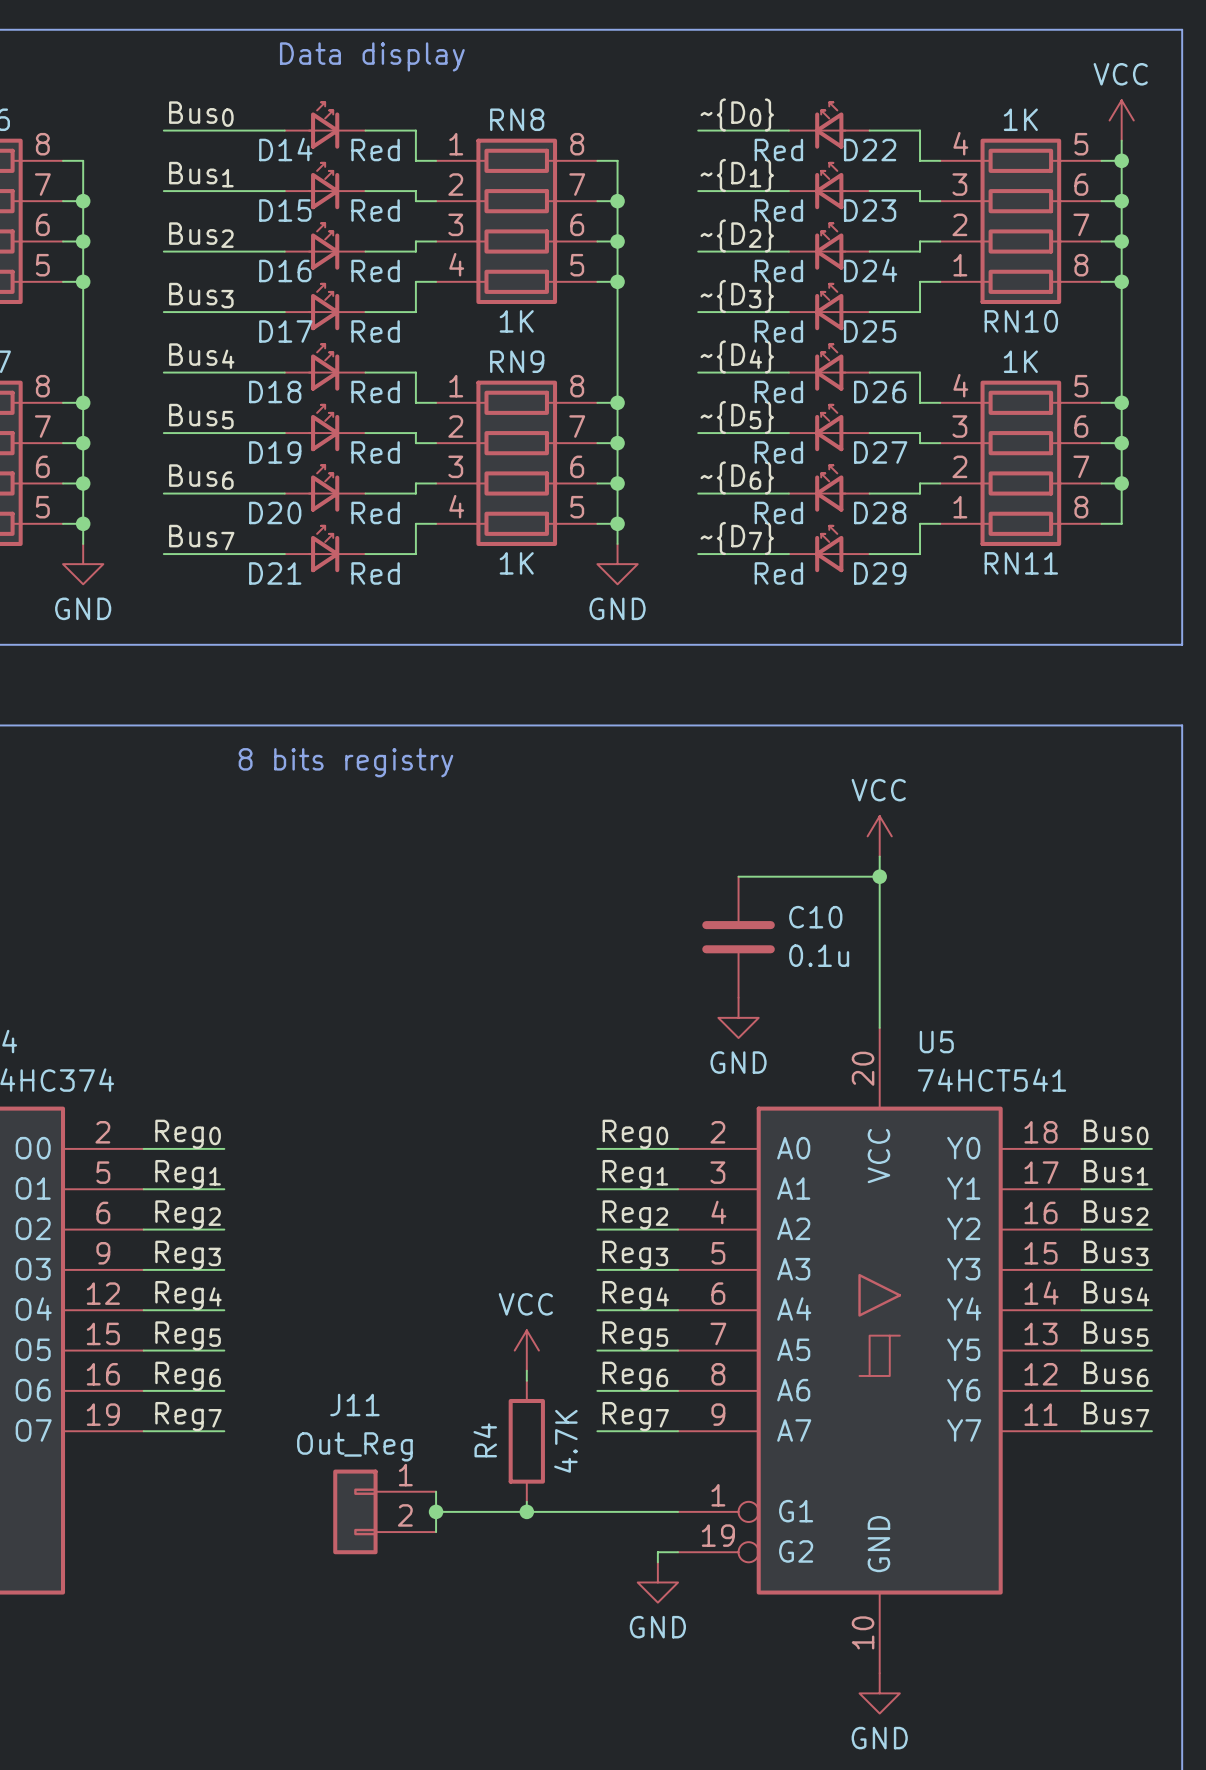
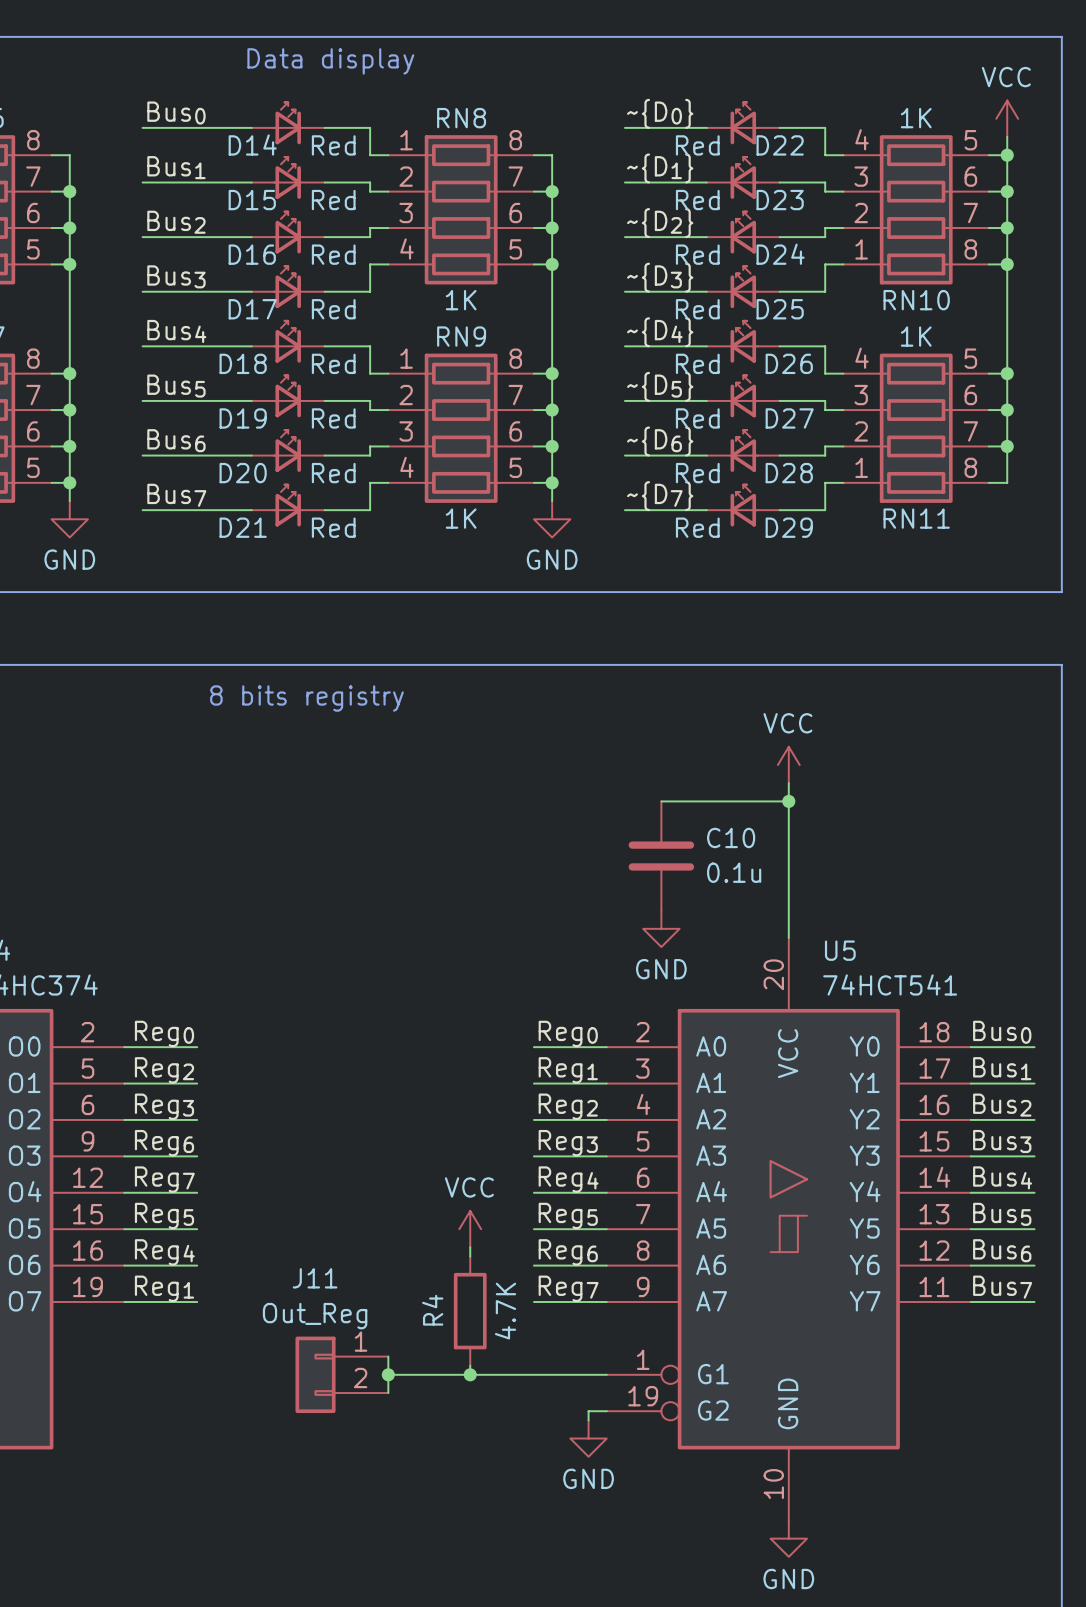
label: Reg1 (188, 1174) -> Reg2 (164, 1070)
label: Reg2 (188, 1214) -> Reg3 (164, 1106)
label: Reg3 (188, 1255) -> Reg6 (164, 1143)
label: Reg4 (188, 1295) -> Reg7 (164, 1179)
label: Reg6 (188, 1376) -> Reg4 (164, 1252)
label: Reg7 (188, 1416) -> Reg1 (164, 1288)

